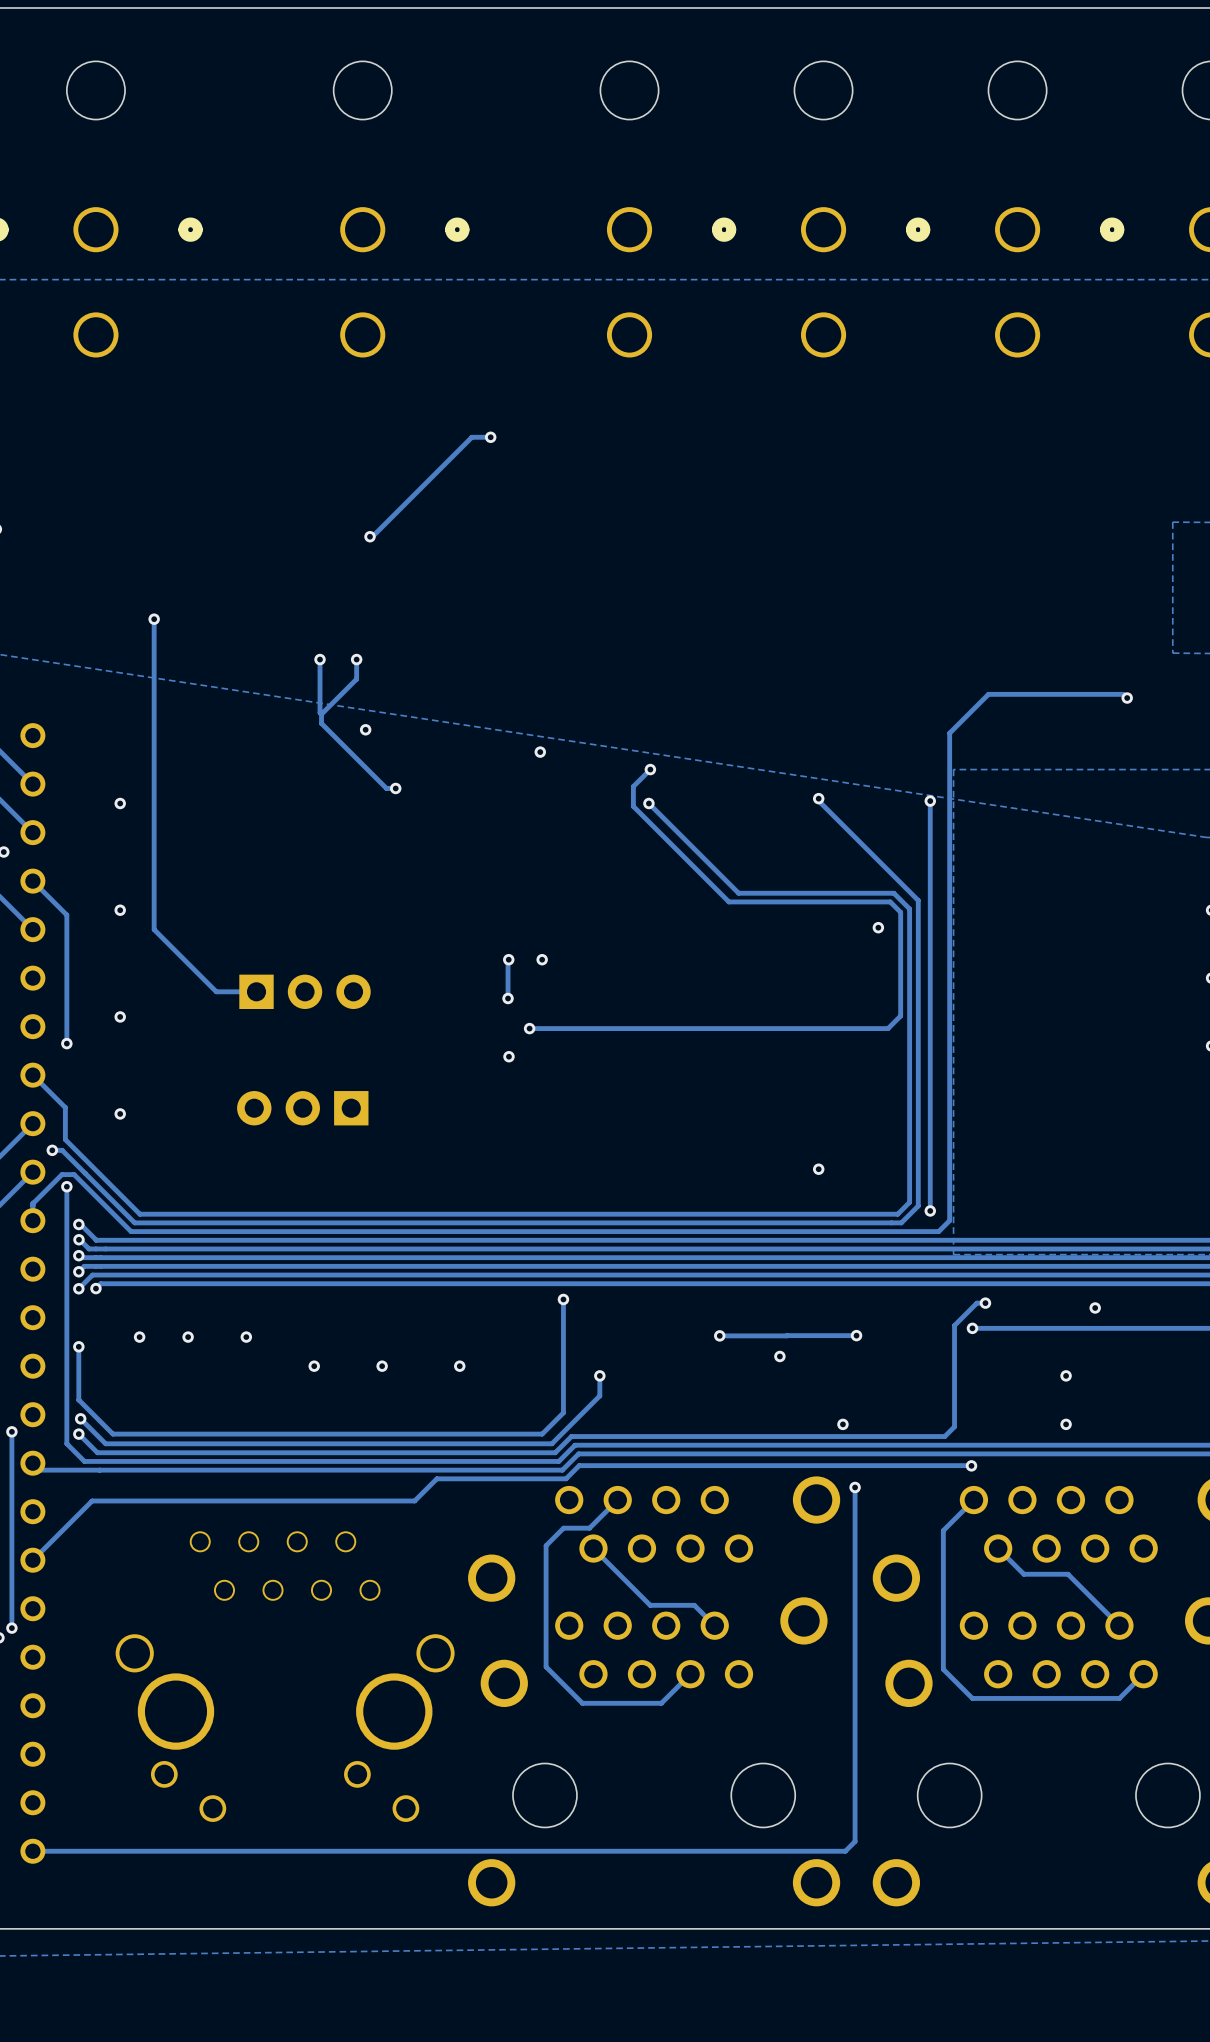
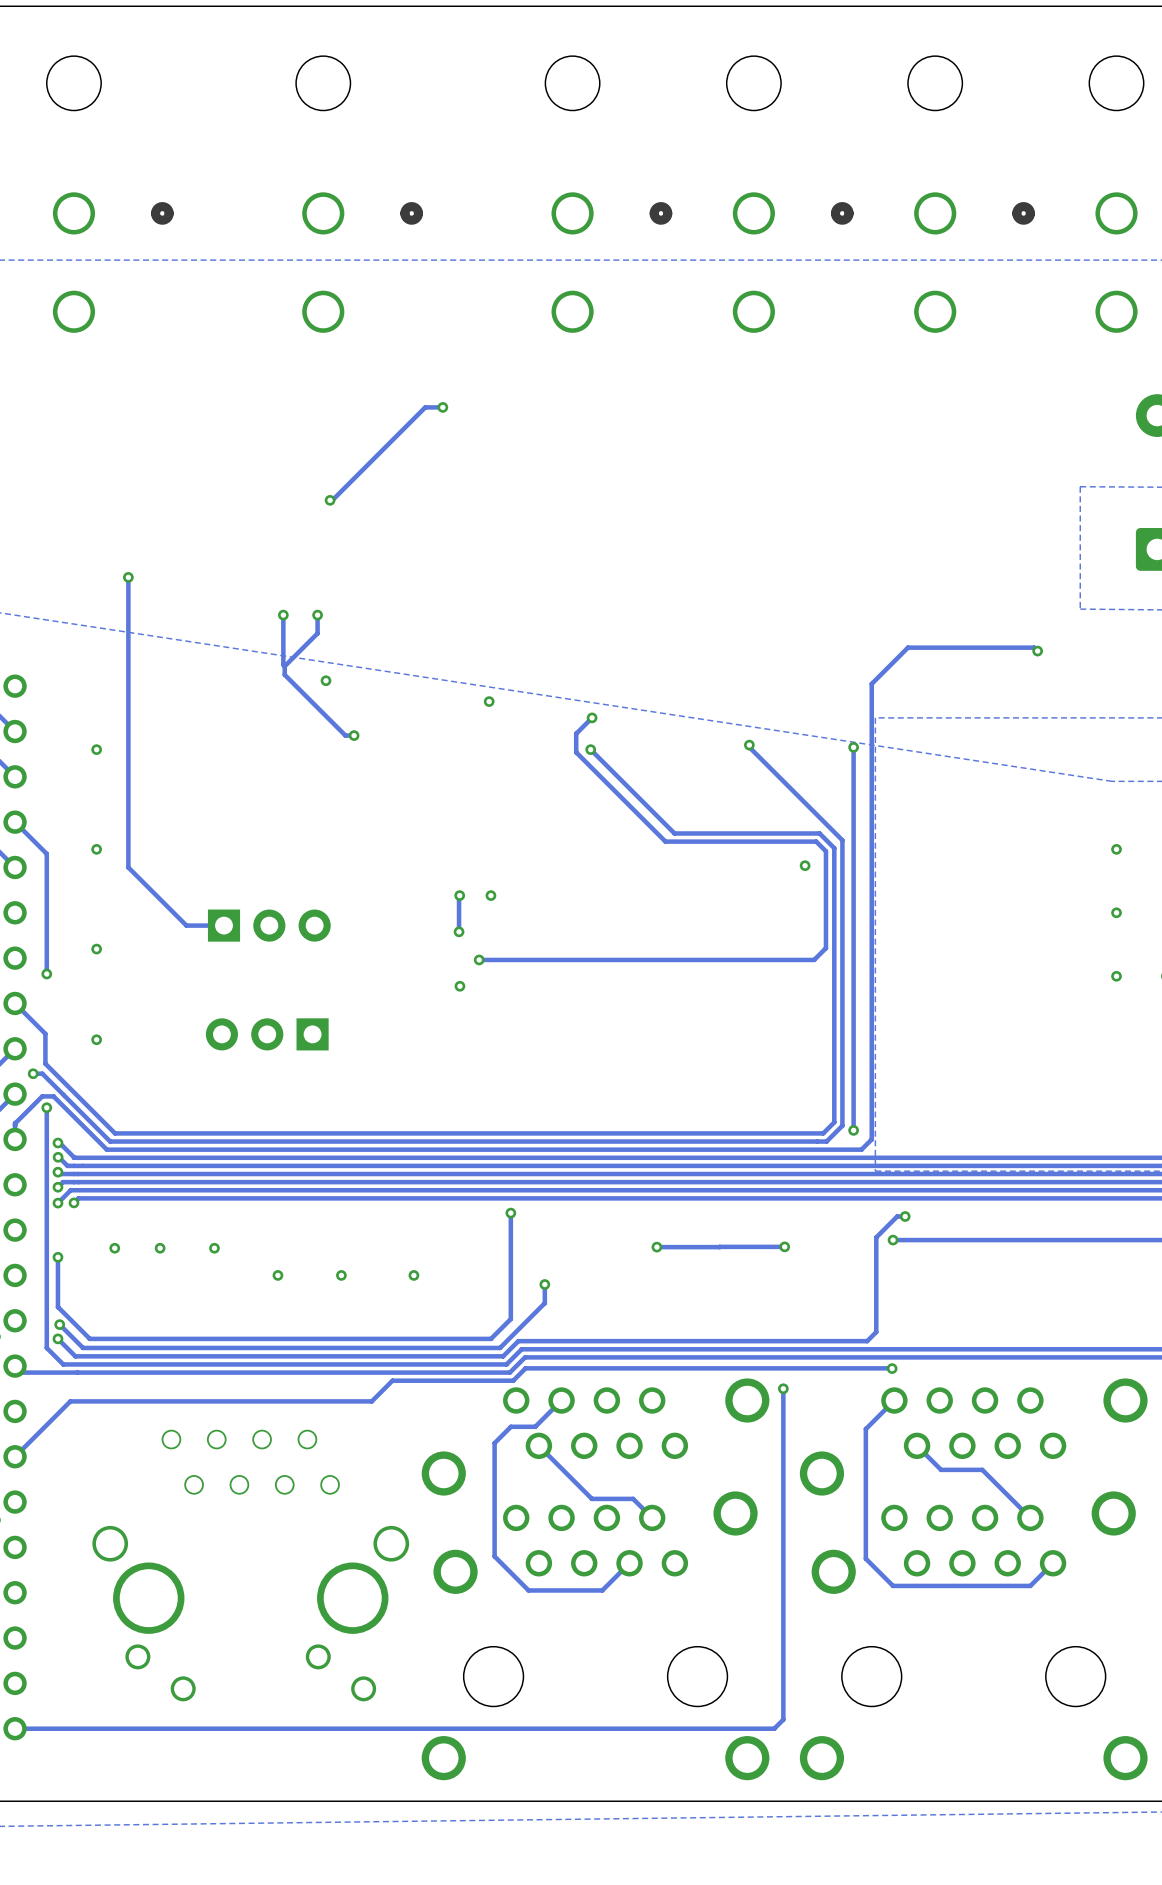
via: (818, 1169) -> none
via: (1095, 1307) -> none
via: (779, 1356) -> none
via: (1066, 1375) -> none
via: (842, 1424) -> none
via: (1066, 1424) -> none

